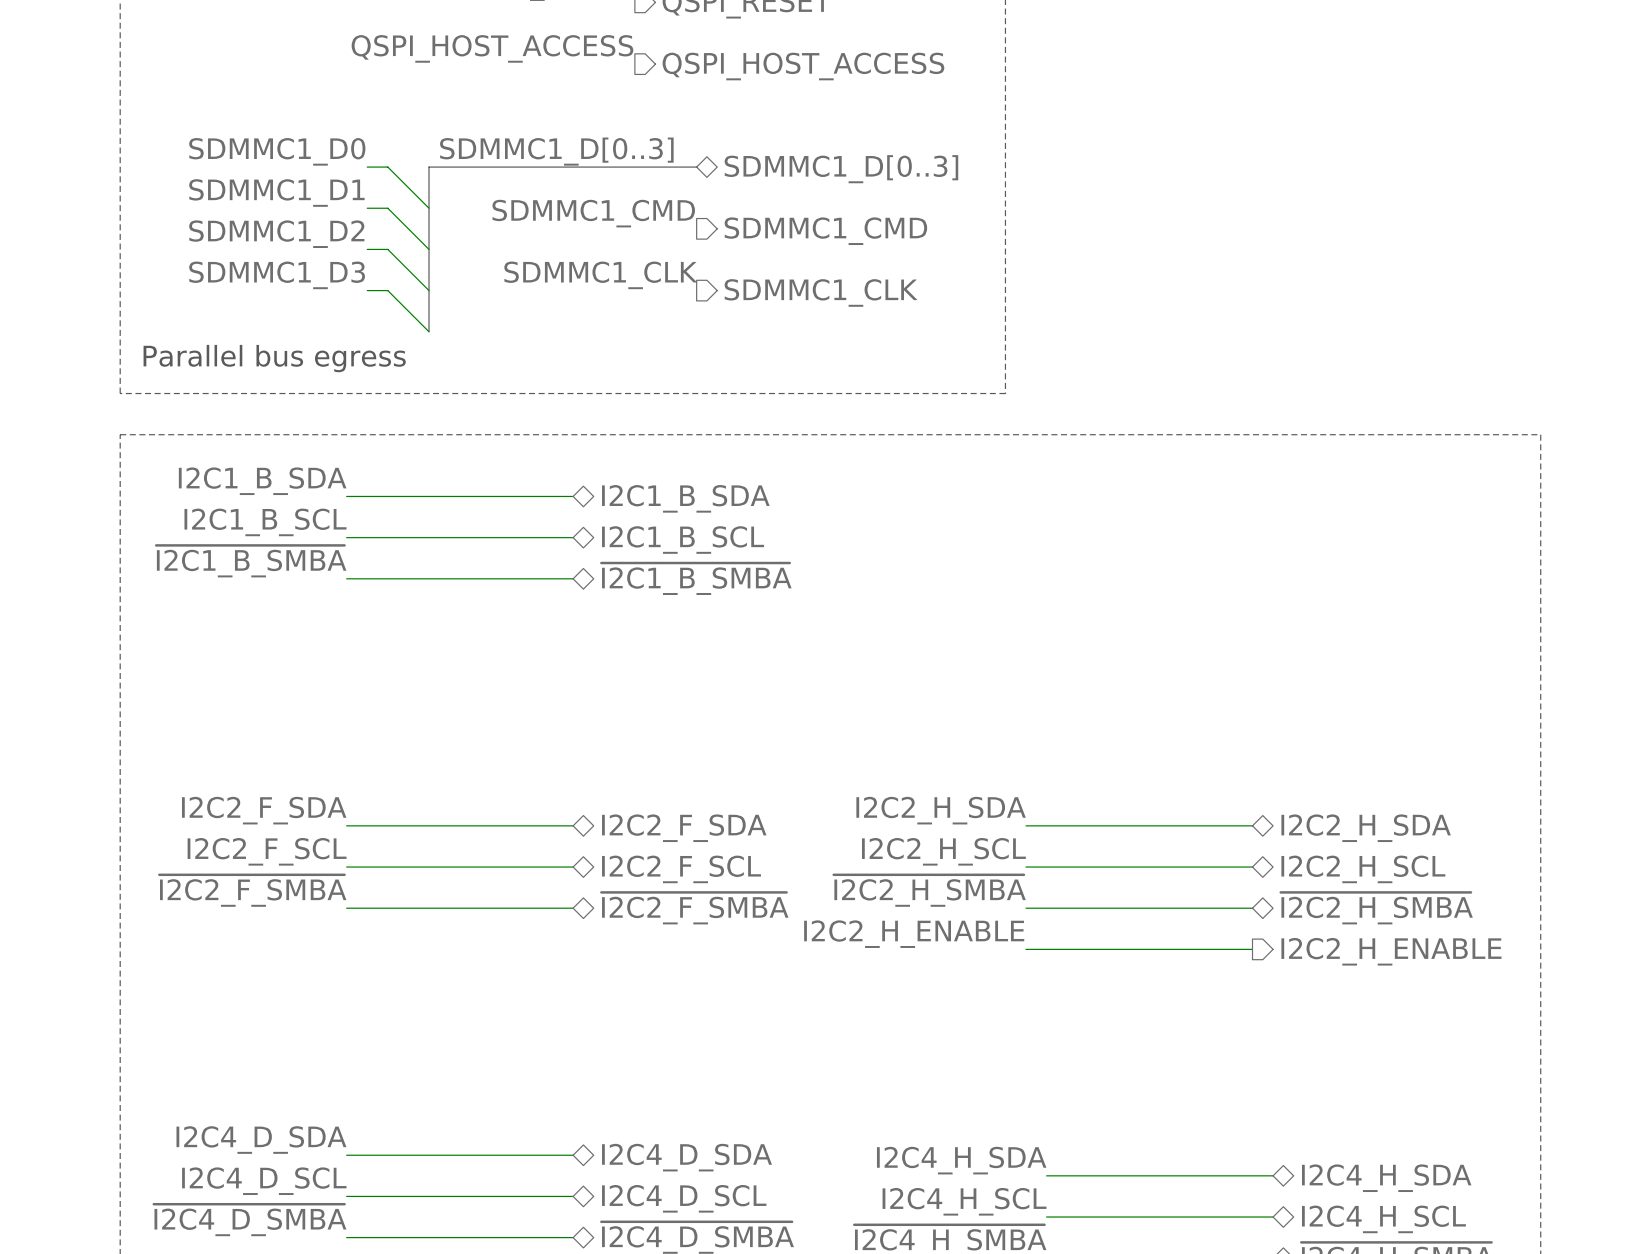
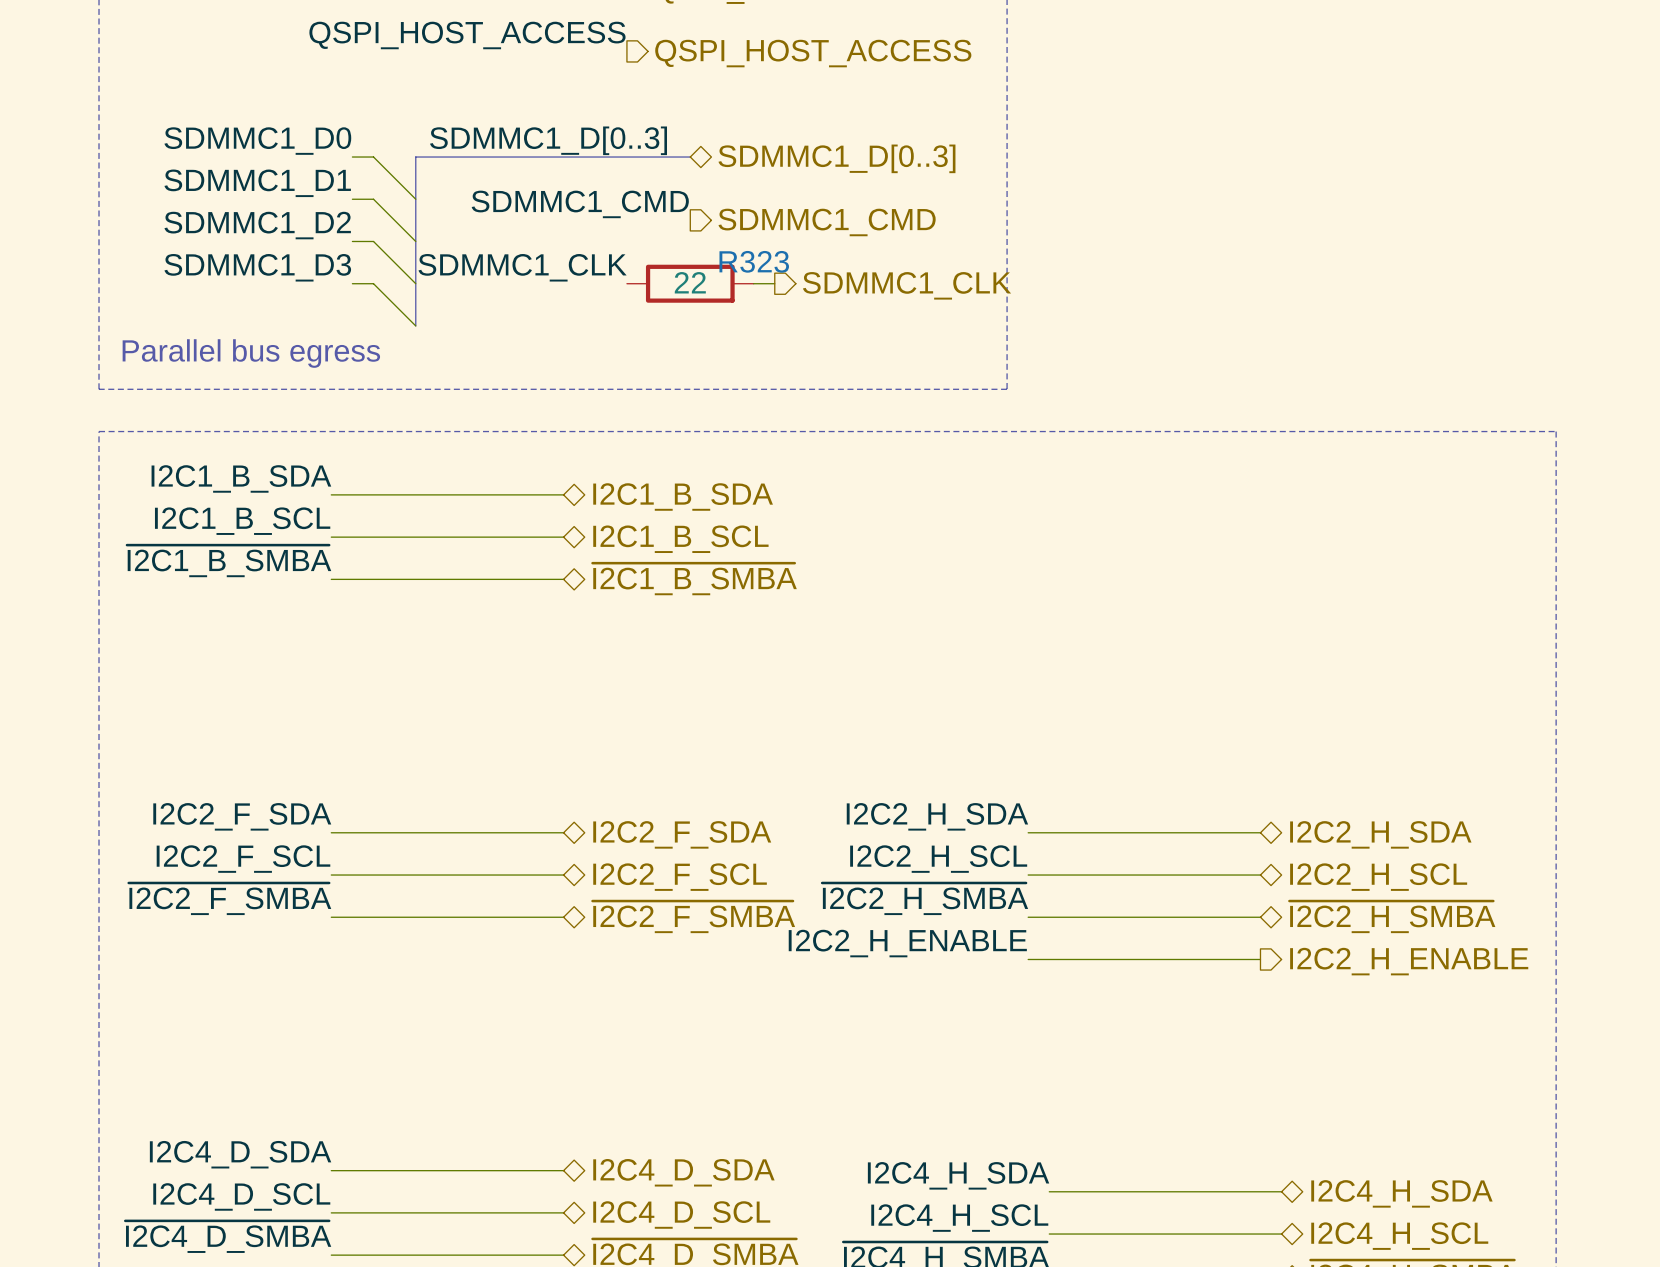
label position: SDMMC1_CLK (600, 275) -> SDMMC1_CLK (522, 267)
R323: none -> 22 (690, 283)
wire: none -> (753, 283) (774, 283)
hierarchical label position: SDMMC1_CLK (821, 292) -> SDMMC1_CLK (907, 285)

